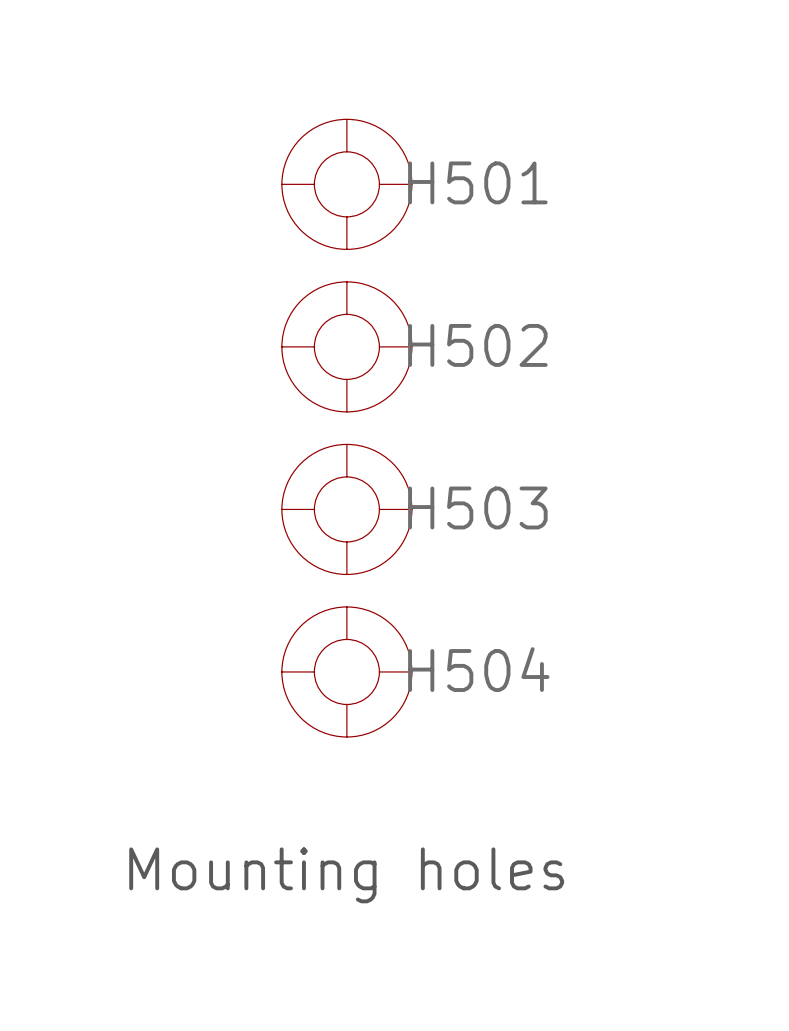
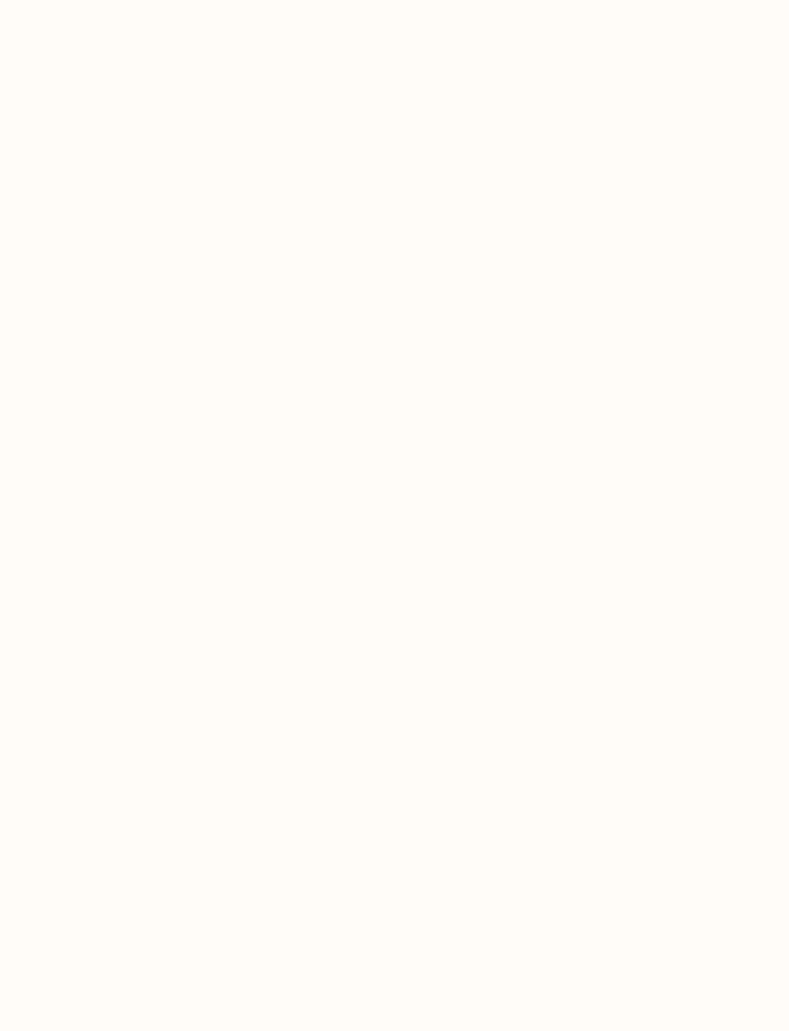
H501: (346, 184) -> none
H502: (346, 346) -> none
H503: (346, 509) -> none
H504: (346, 671) -> none
text: Mounting holes (346, 875) -> none

